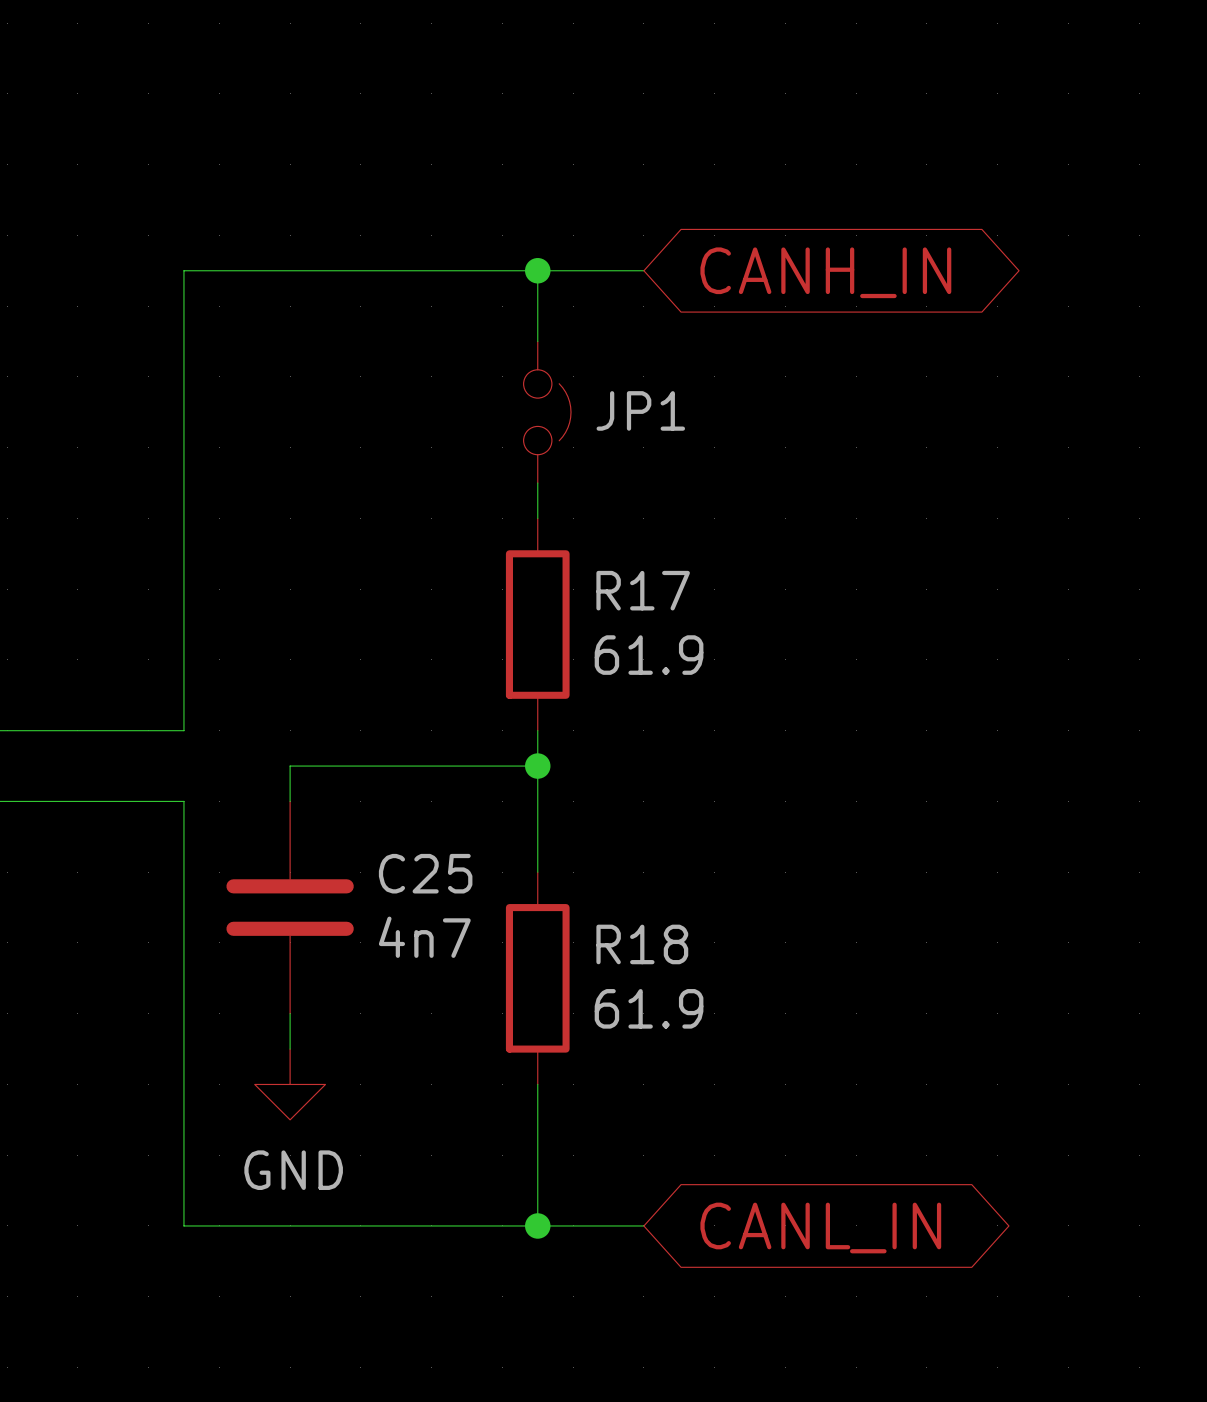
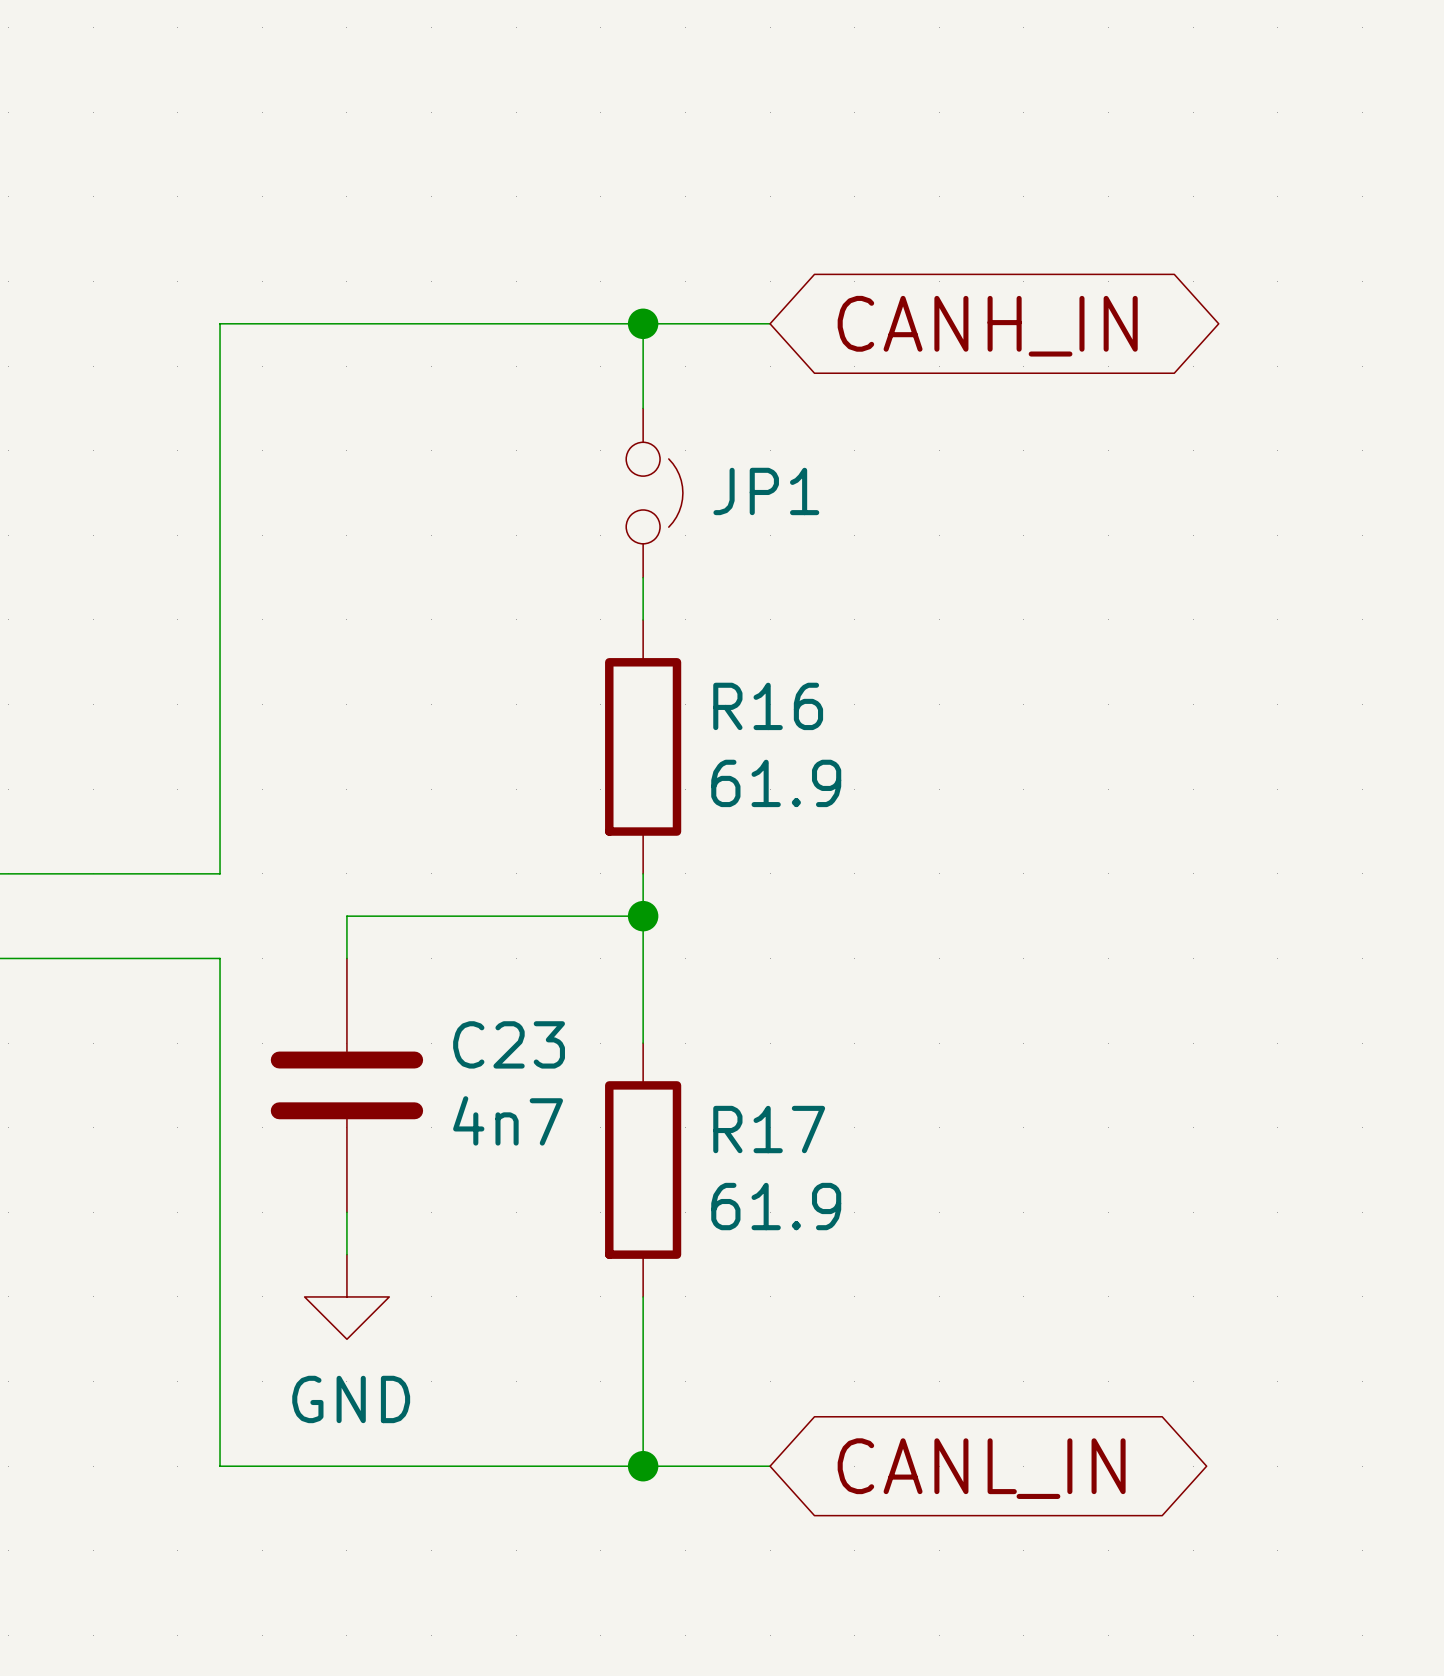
R17 name: R17 (643, 590) -> R16 (768, 706)
C25 name: C25 (425, 873) -> C23 (509, 1044)
R18 name: R18 (642, 944) -> R17 (769, 1129)

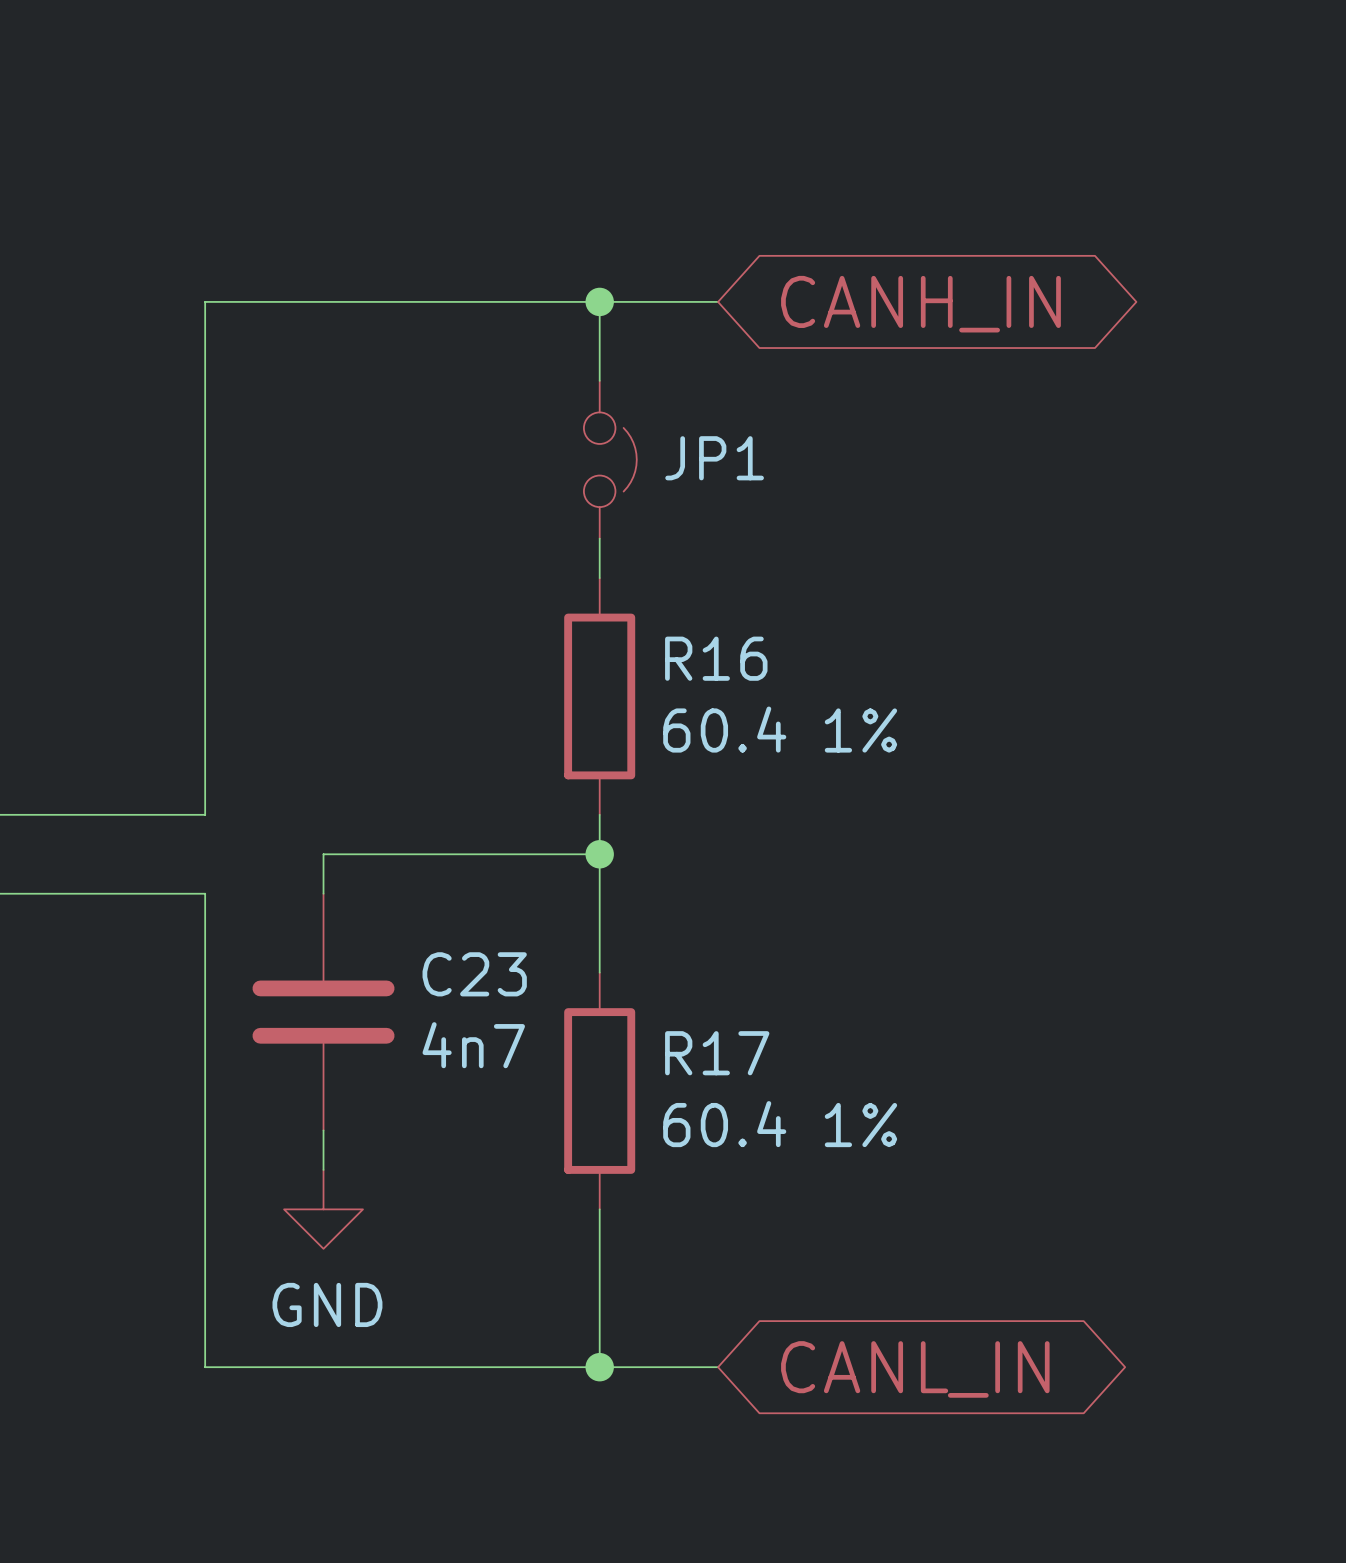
R16 value: 61.9 (776, 783) -> 60.4 1% (780, 729)
R17 value: 61.9 (776, 1206) -> 60.4 1% (780, 1124)

